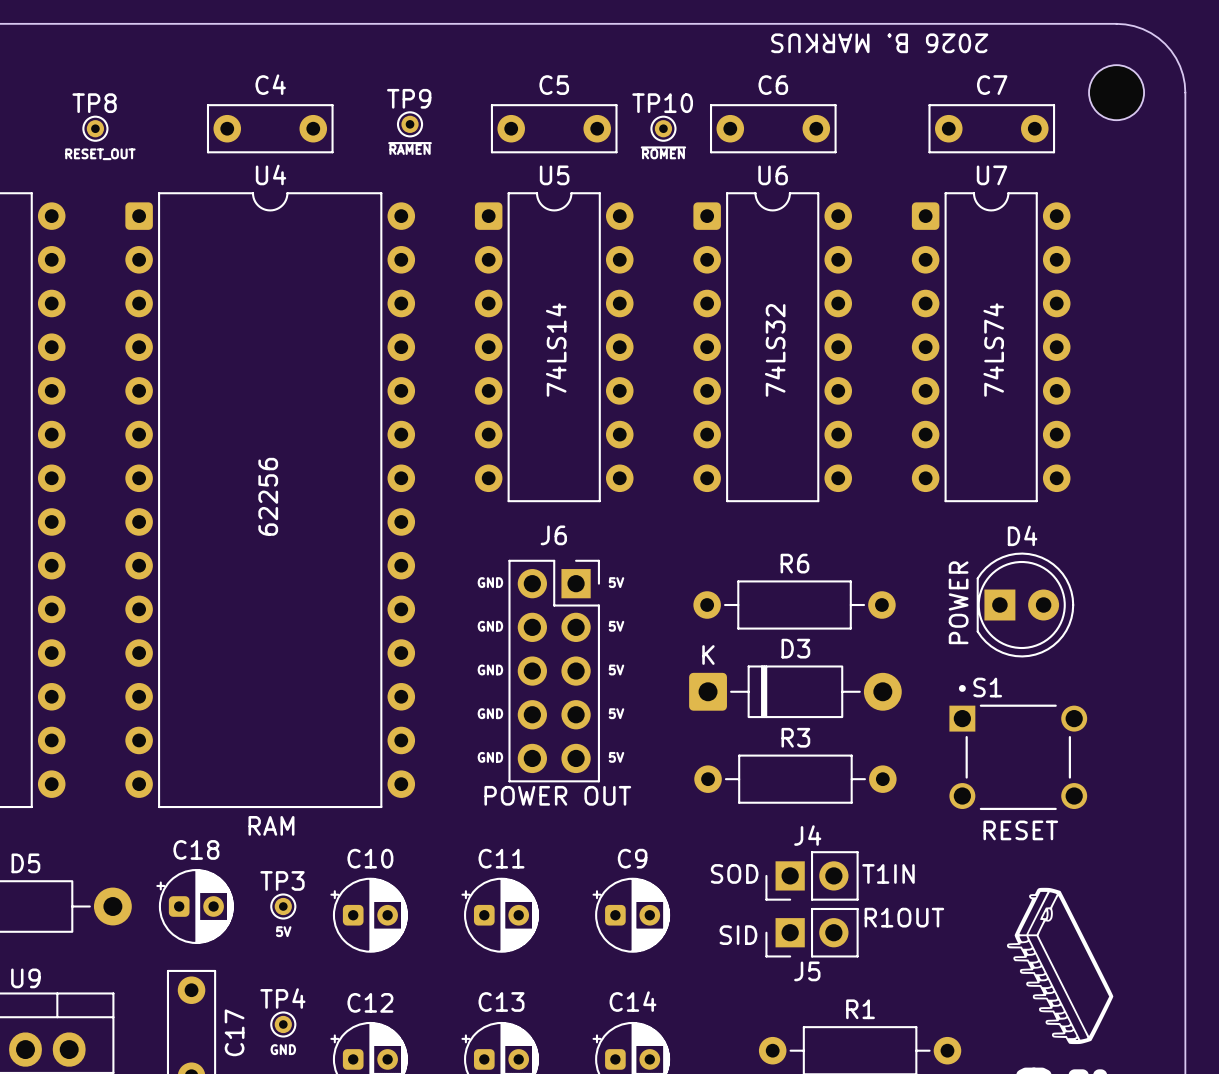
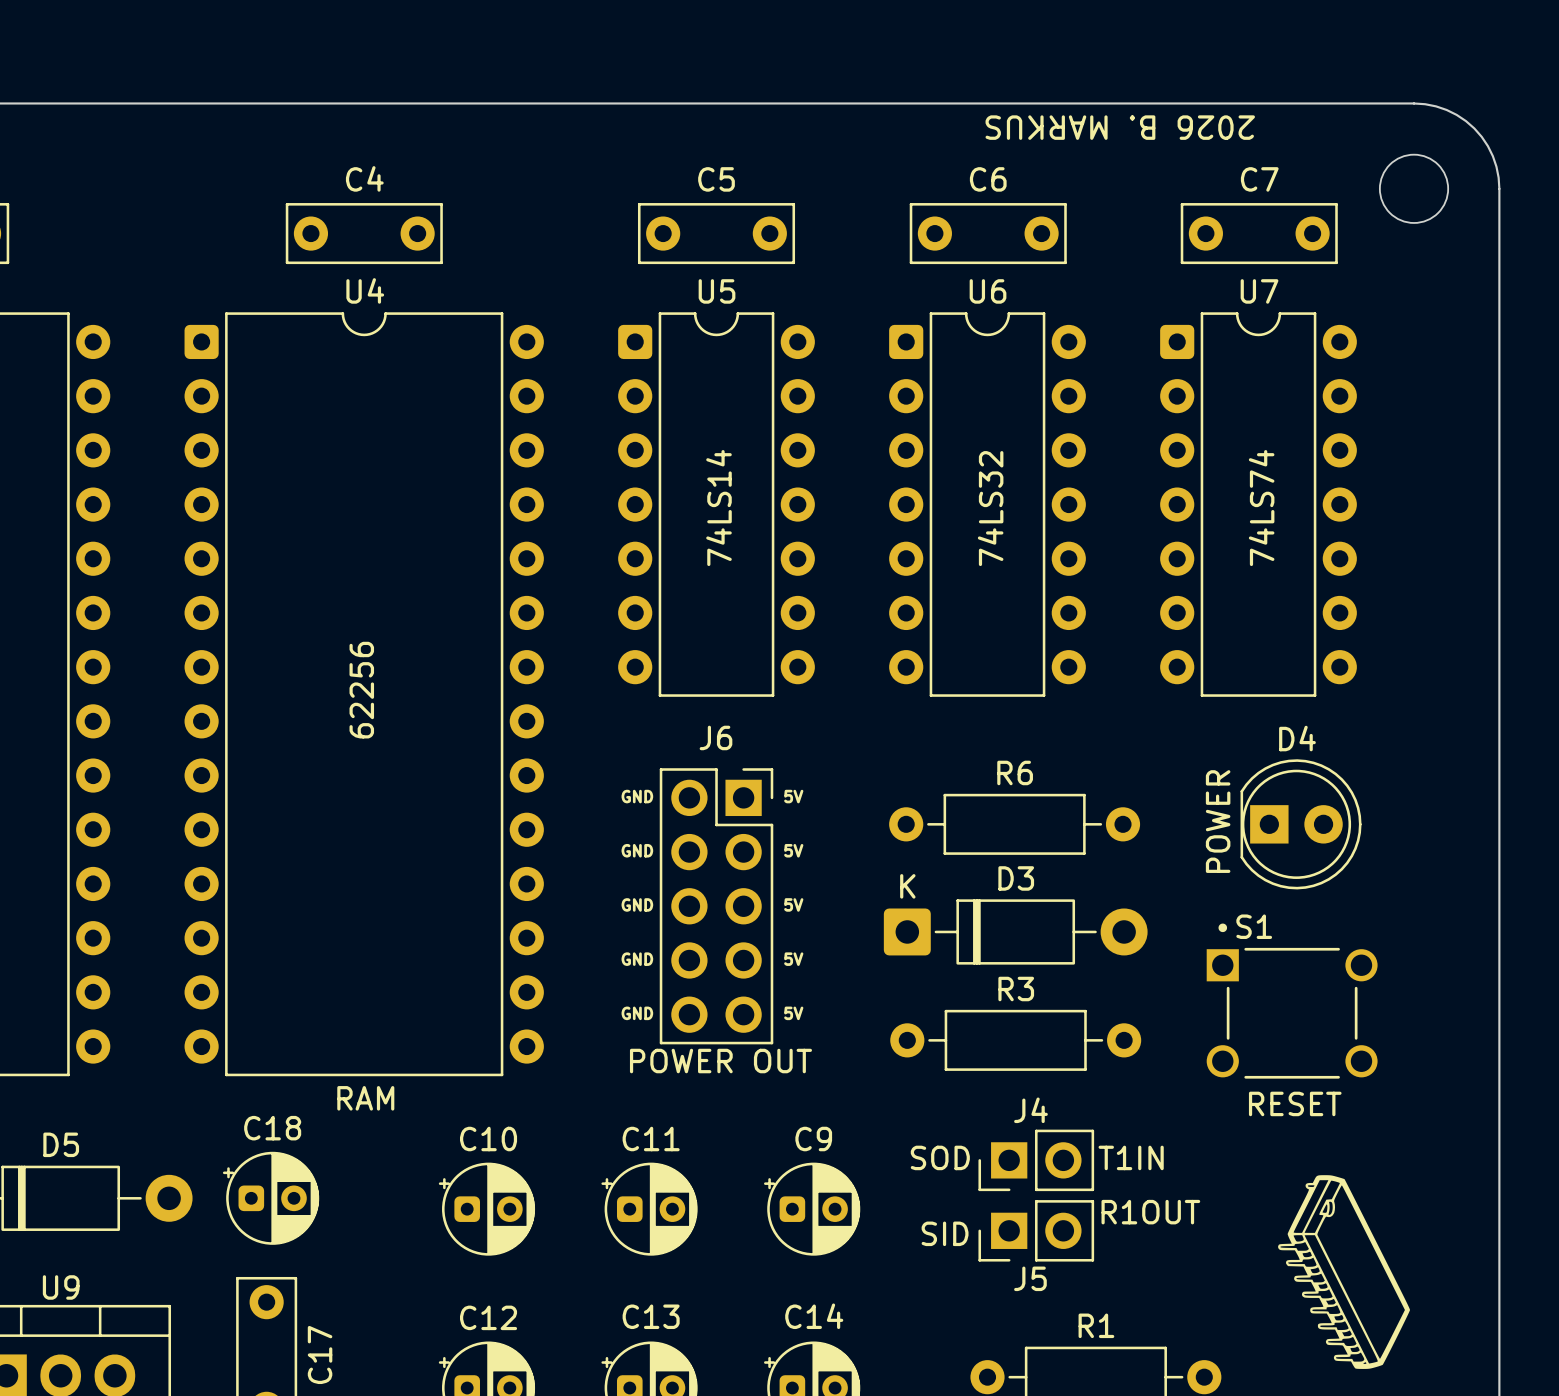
TP9: (410, 124) -> none
TP8: (95, 128) -> none
TP10: (663, 128) -> none
text: ~{RAMEN} (410, 148) -> none
text: ~{ROMEN} (663, 152) -> none
text: RESET_OUT (100, 154) -> none
TP3: (283, 906) -> none
text: 5V (283, 931) -> none
TP4: (283, 1024) -> none
text: GND (283, 1049) -> none

